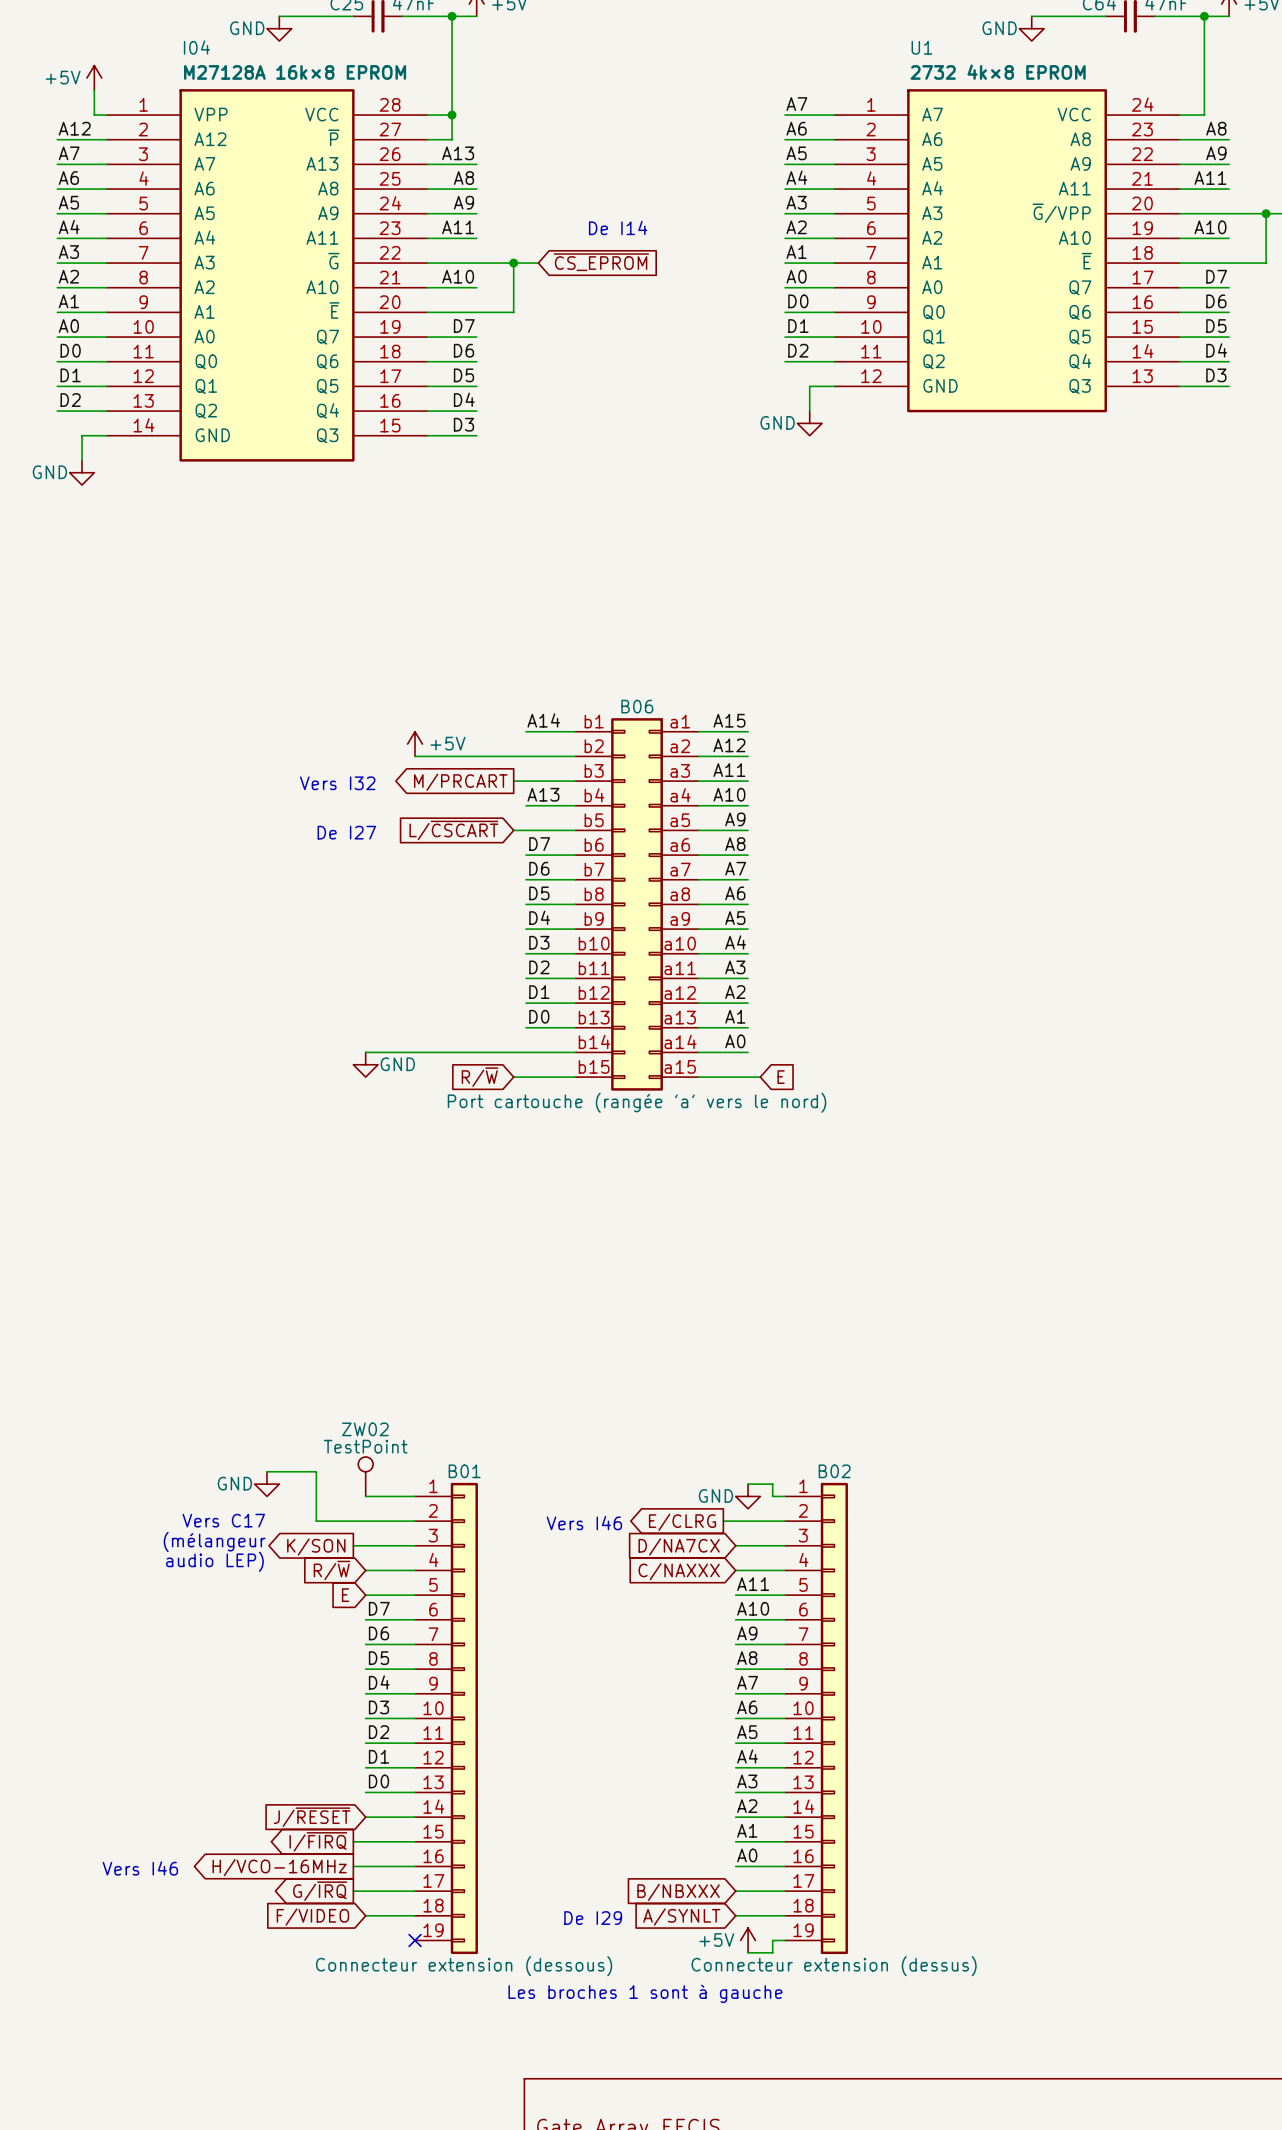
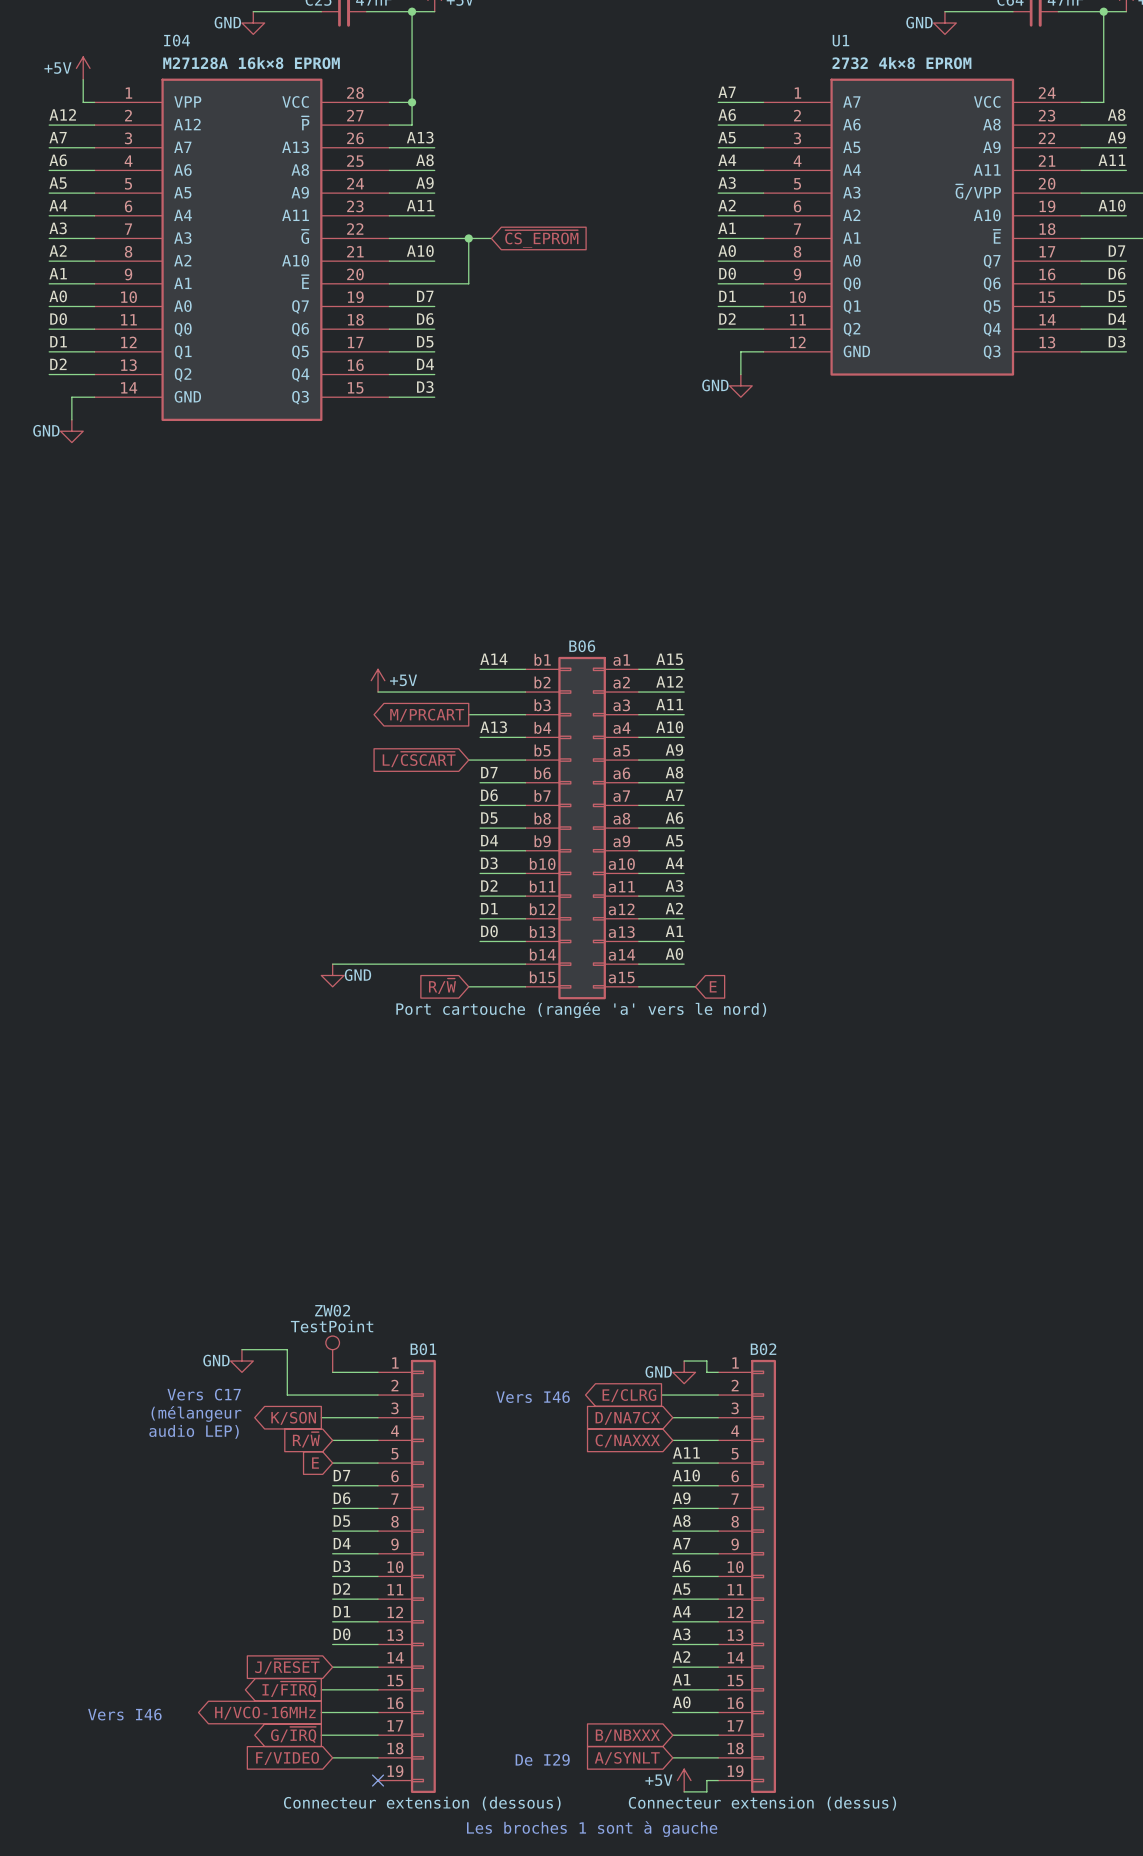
text: De I14 (618, 227) -> none
text: Vers I32 (337, 783) -> none
text: De I27 (346, 832) -> none

